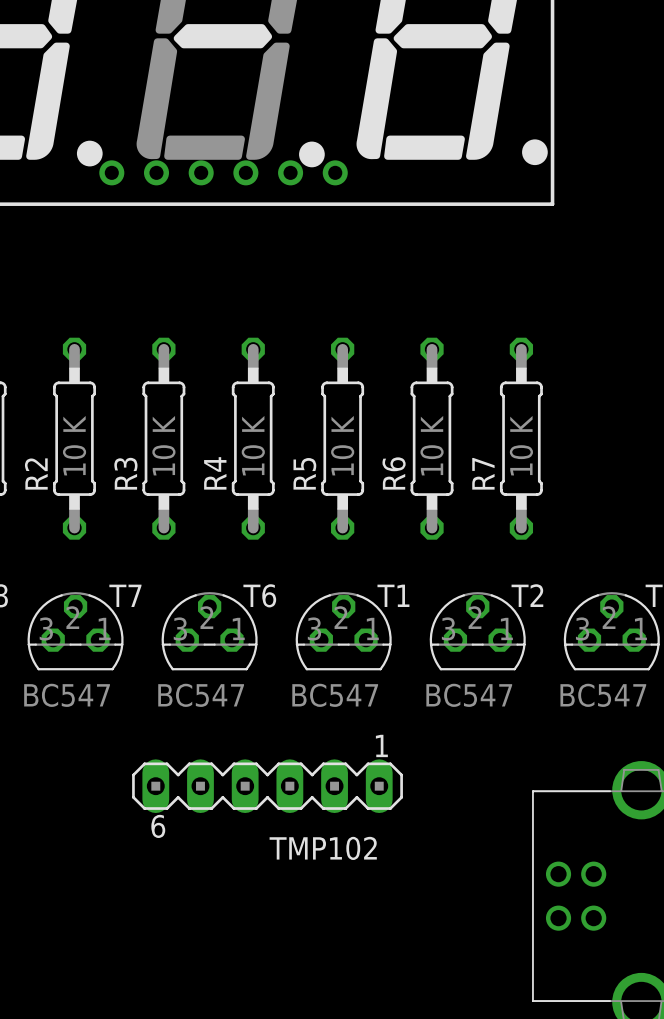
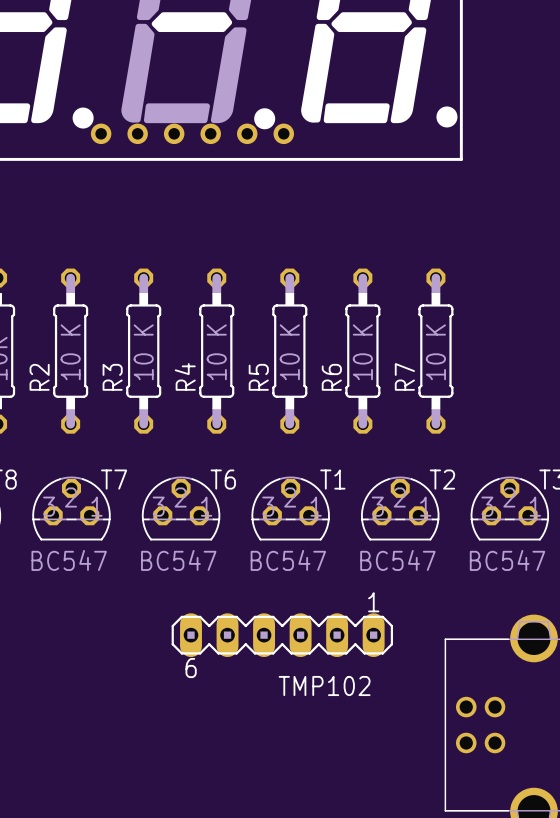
TMP102 position: (267, 786) -> (282, 635)

